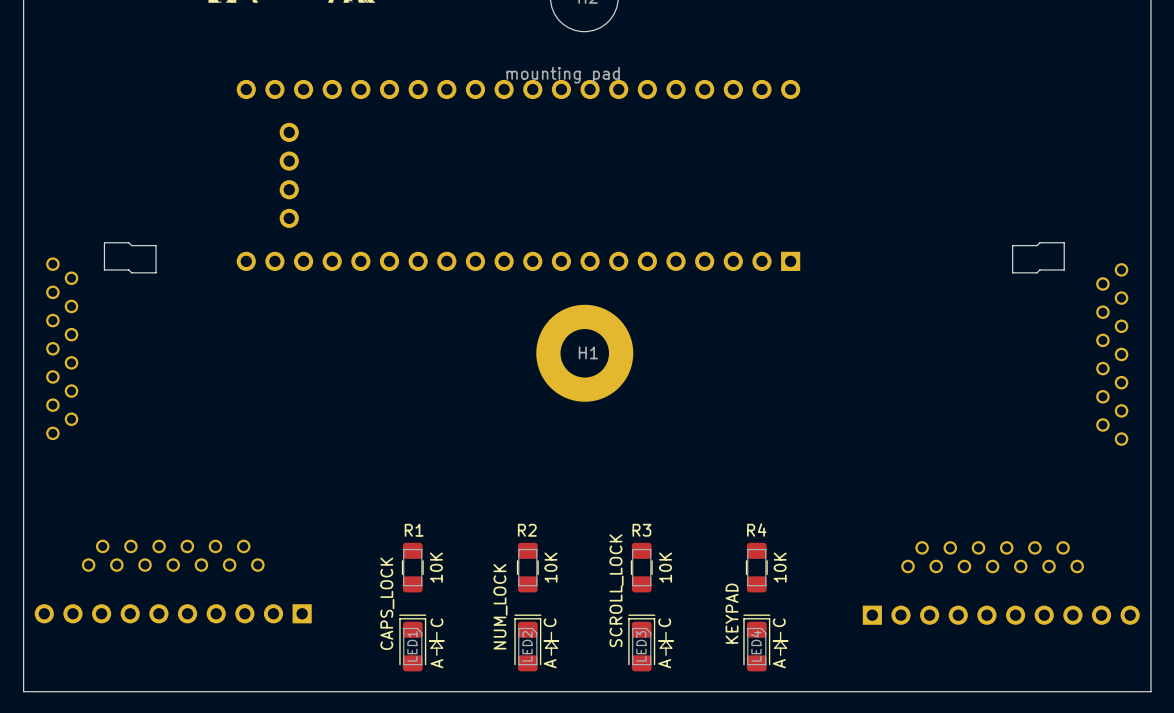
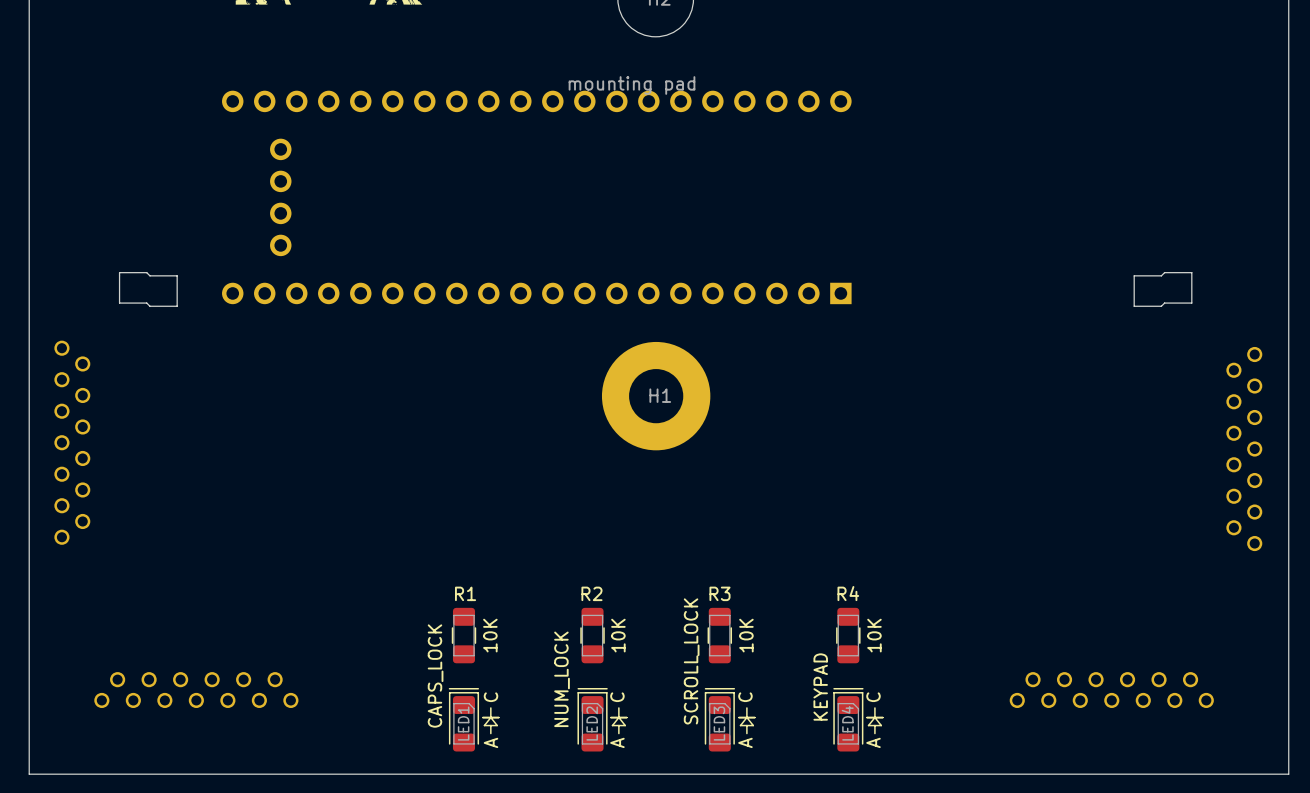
part position: (518, 175) -> (536, 197)
part position: (62, 348) -> (72, 442)
part position: (1112, 354) -> (1244, 449)
part: (173, 555) -> none
part: (992, 557) -> none
part footprint: [34, 604, 312, 624] -> [94, 672, 299, 709]
part footprint: [862, 605, 1140, 625] -> [1009, 672, 1214, 709]

